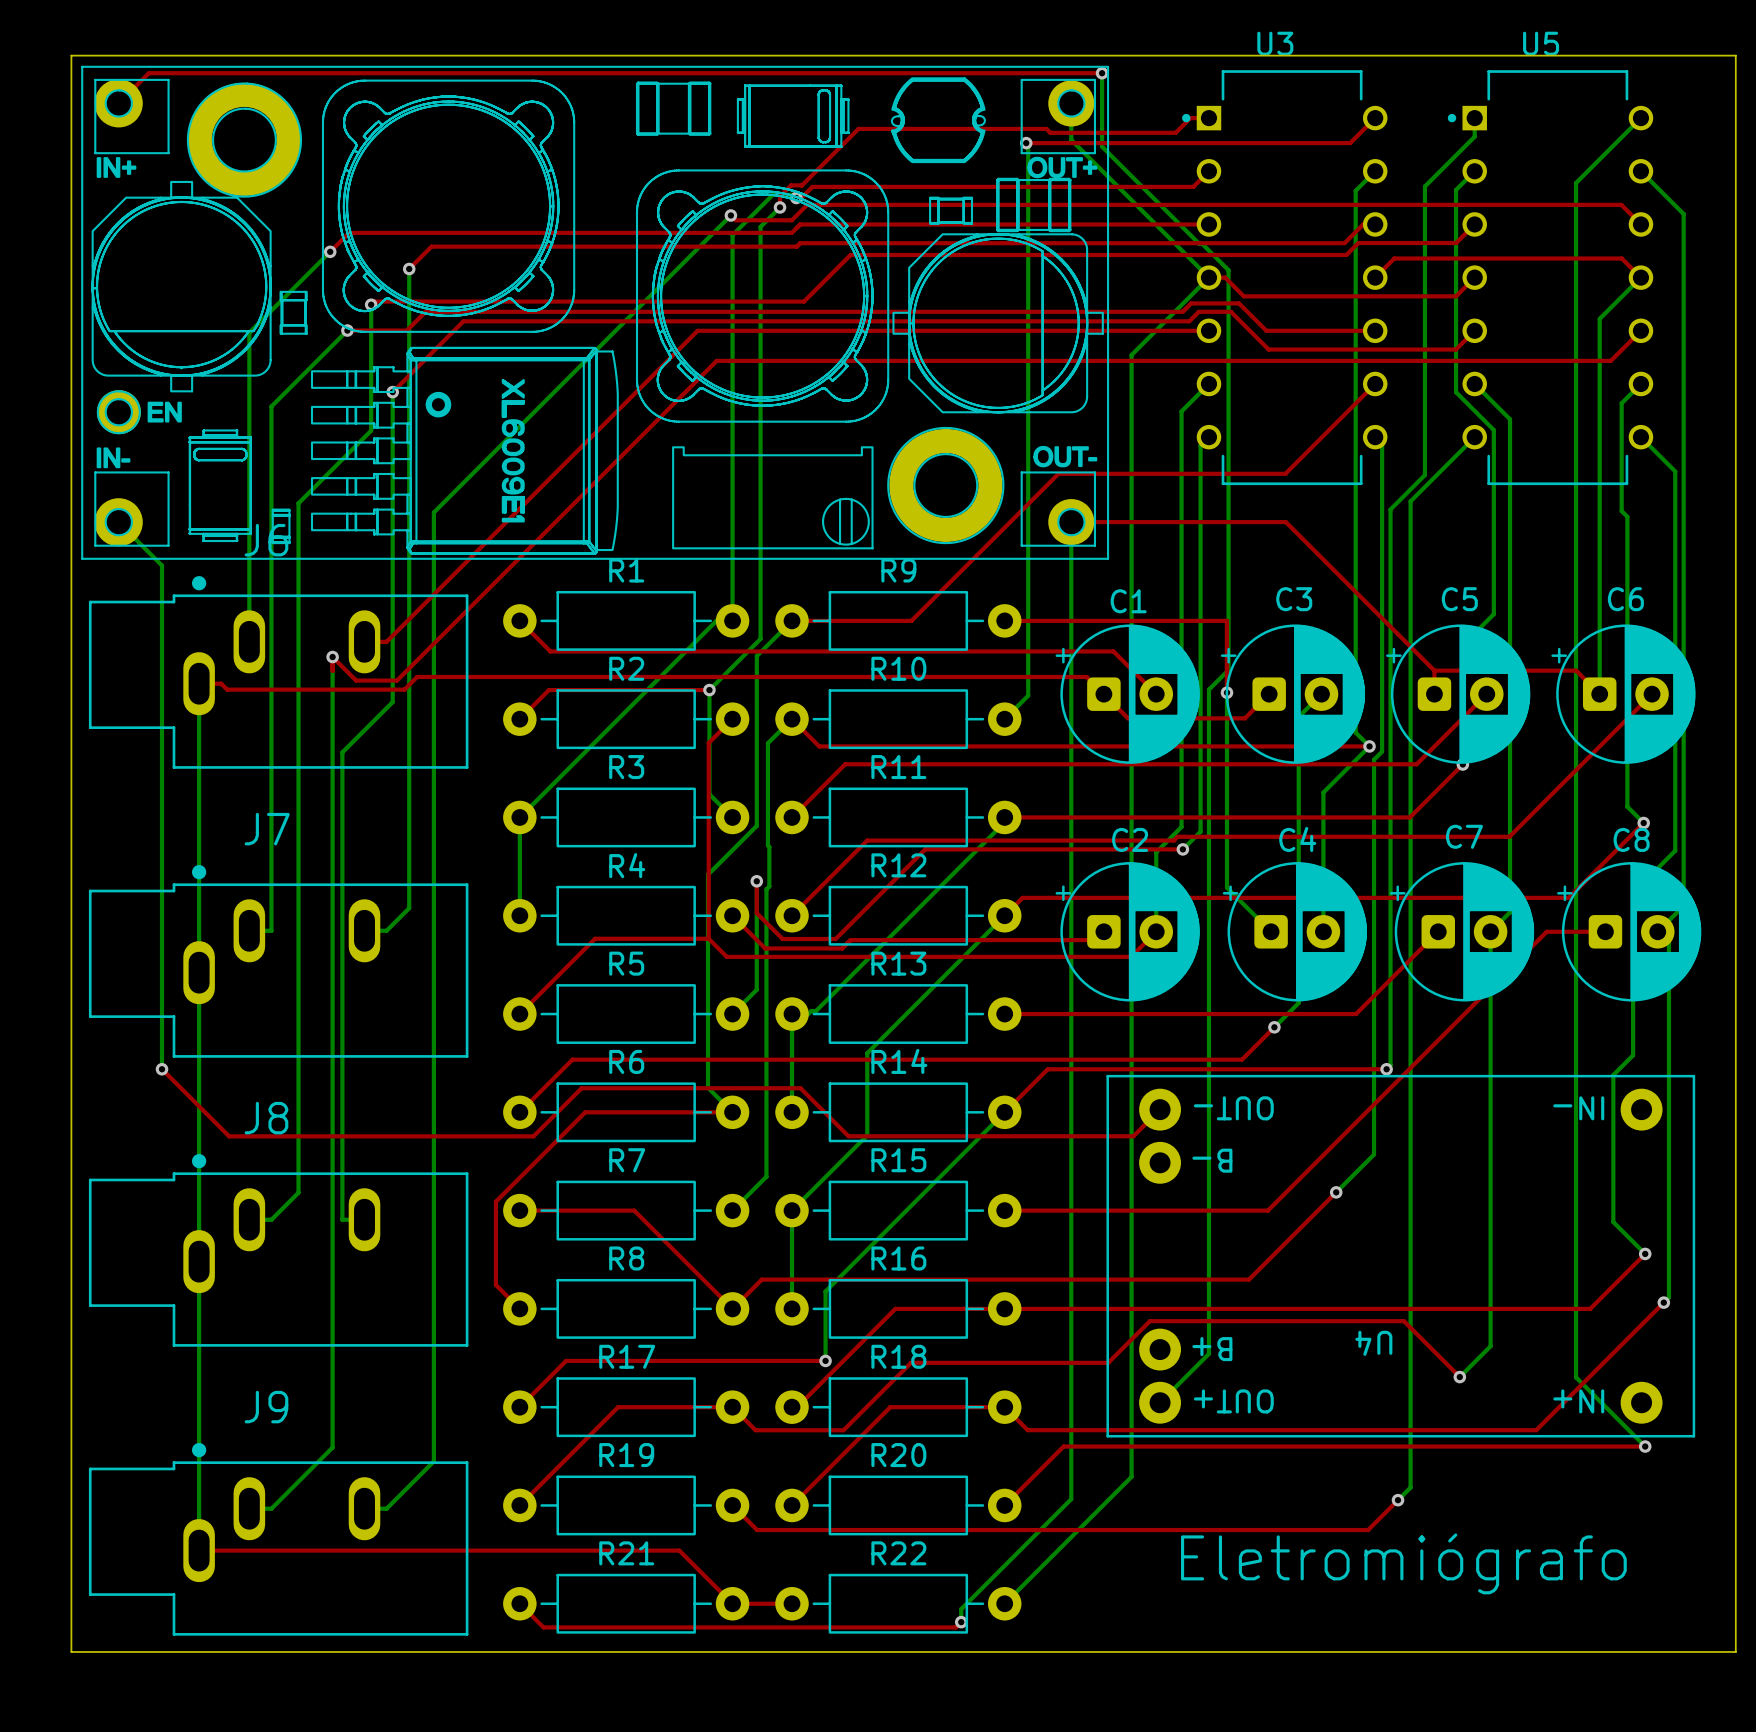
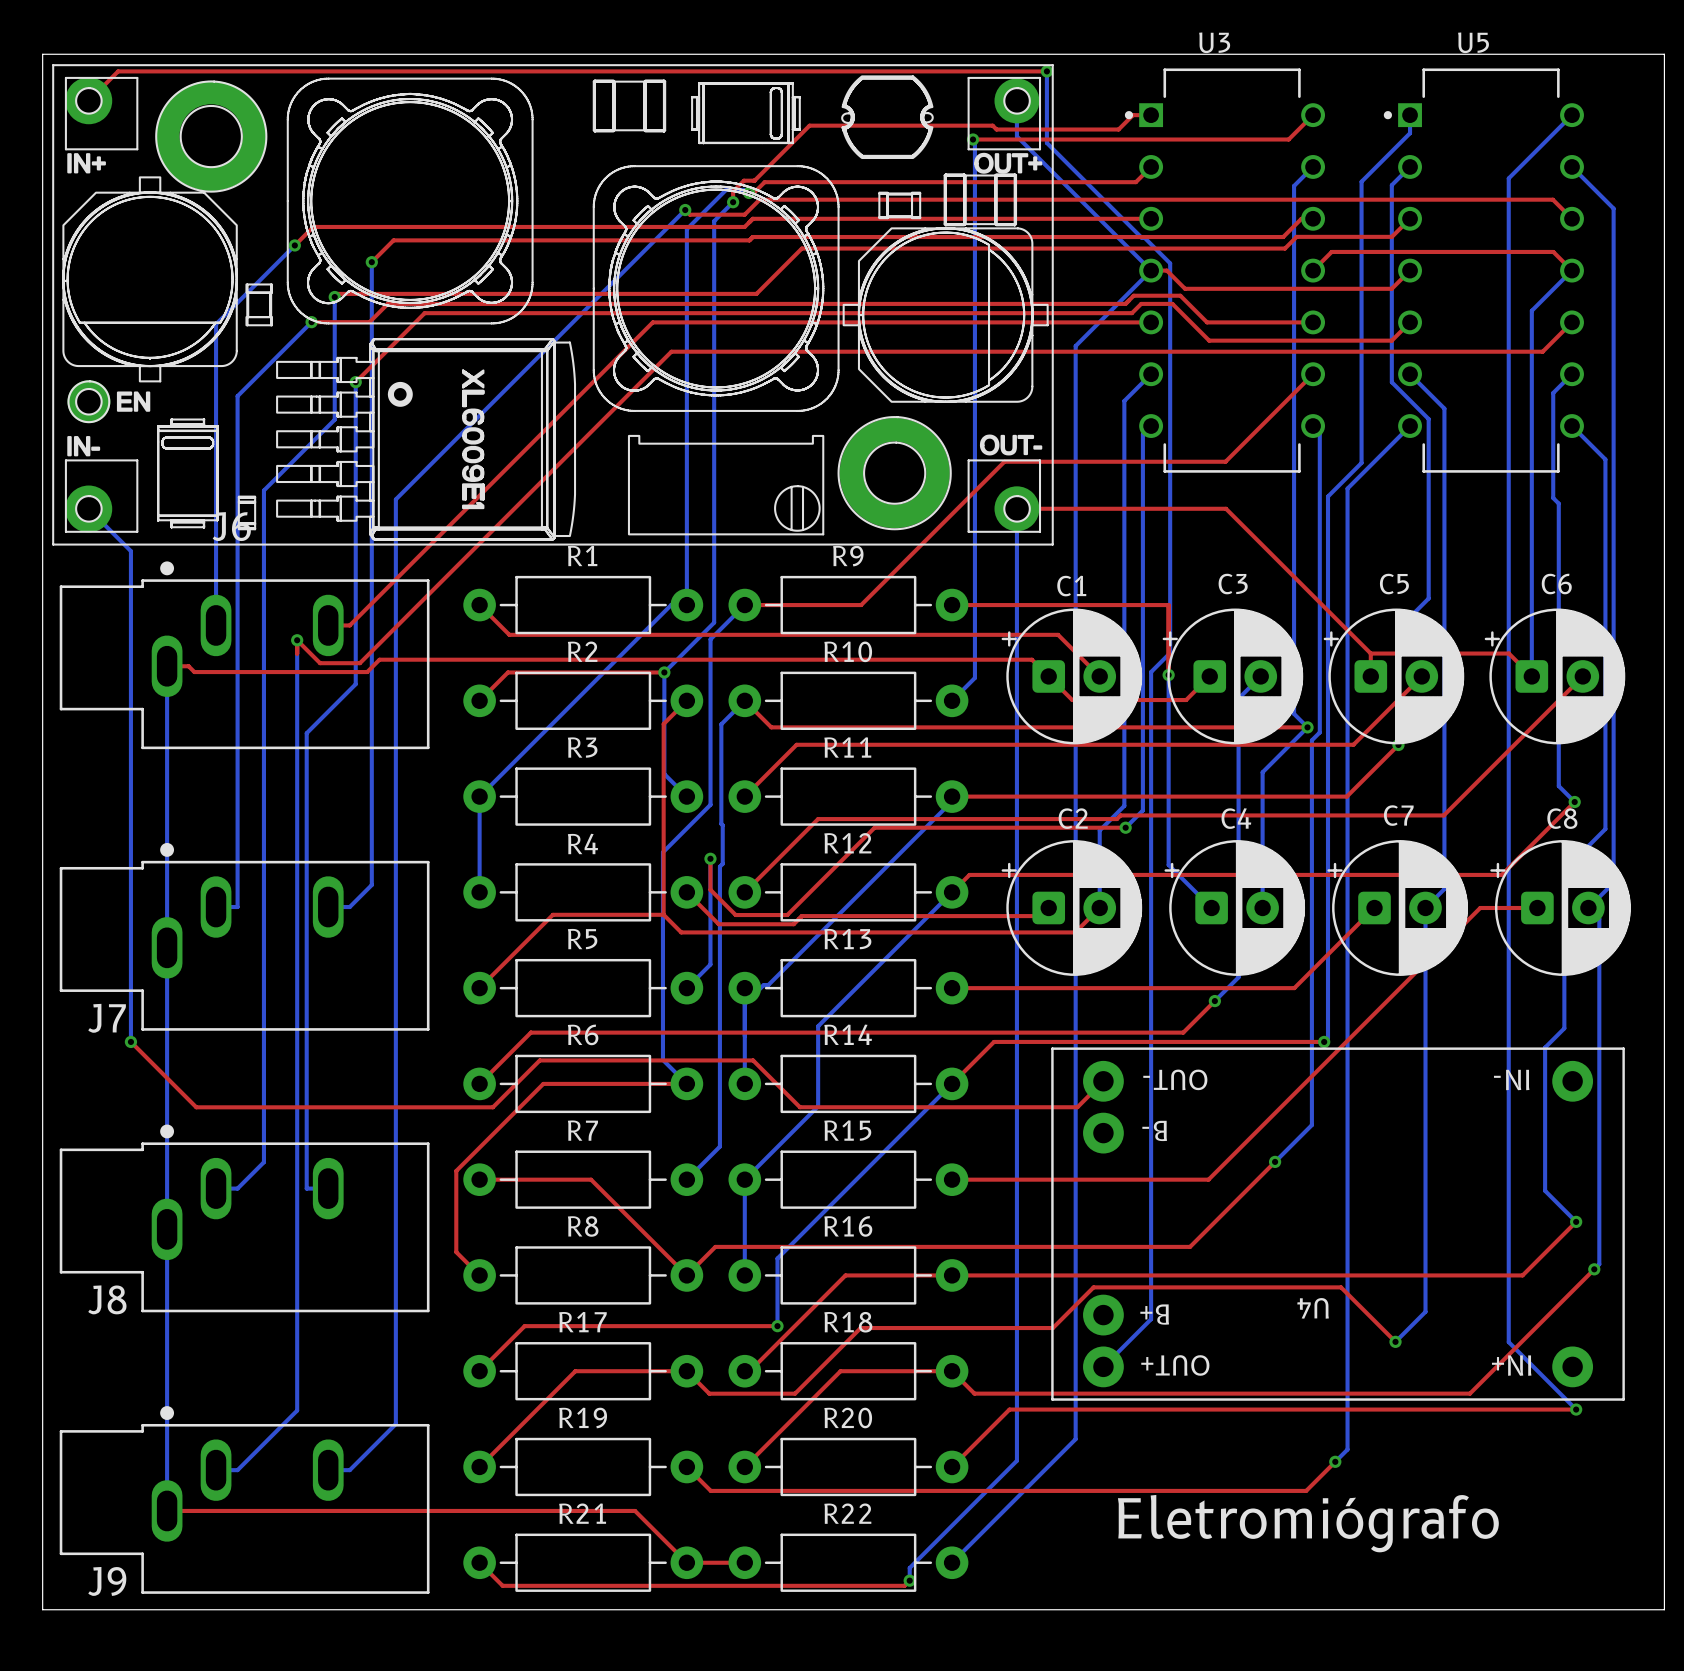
J7 name position: J7 (267, 829) -> J7 (107, 1018)
J8 name position: J8 (266, 1118) -> J8 (107, 1299)
J9 name position: J9 (266, 1407) -> J9 (107, 1581)

